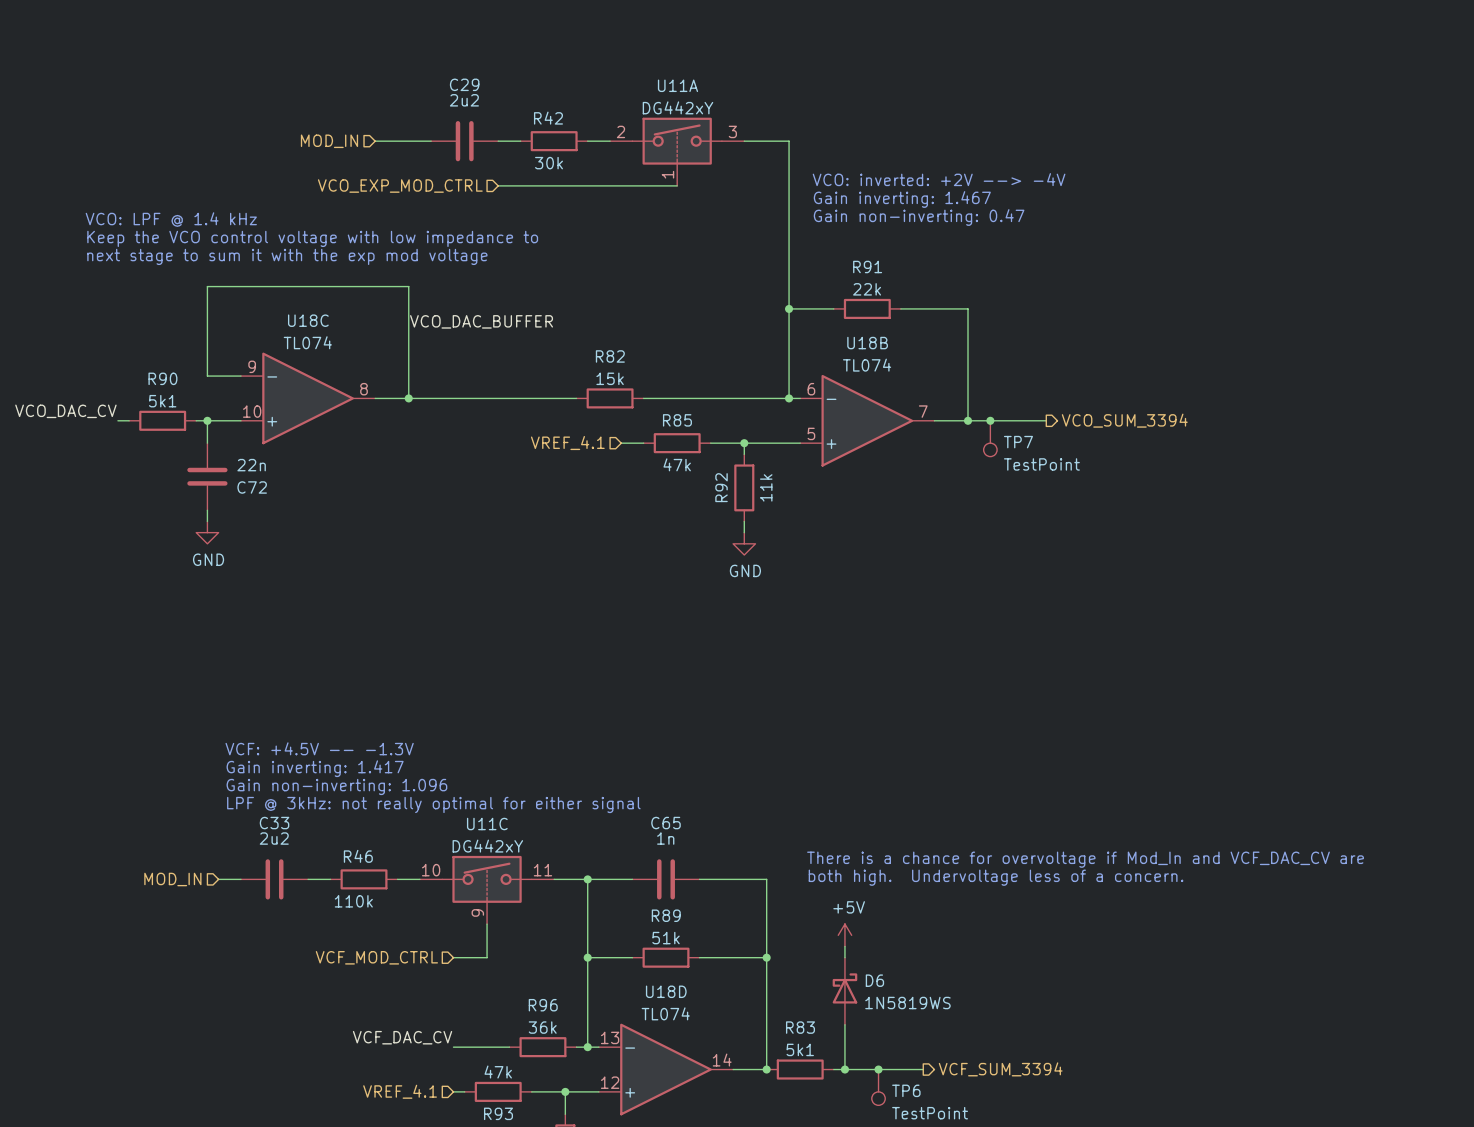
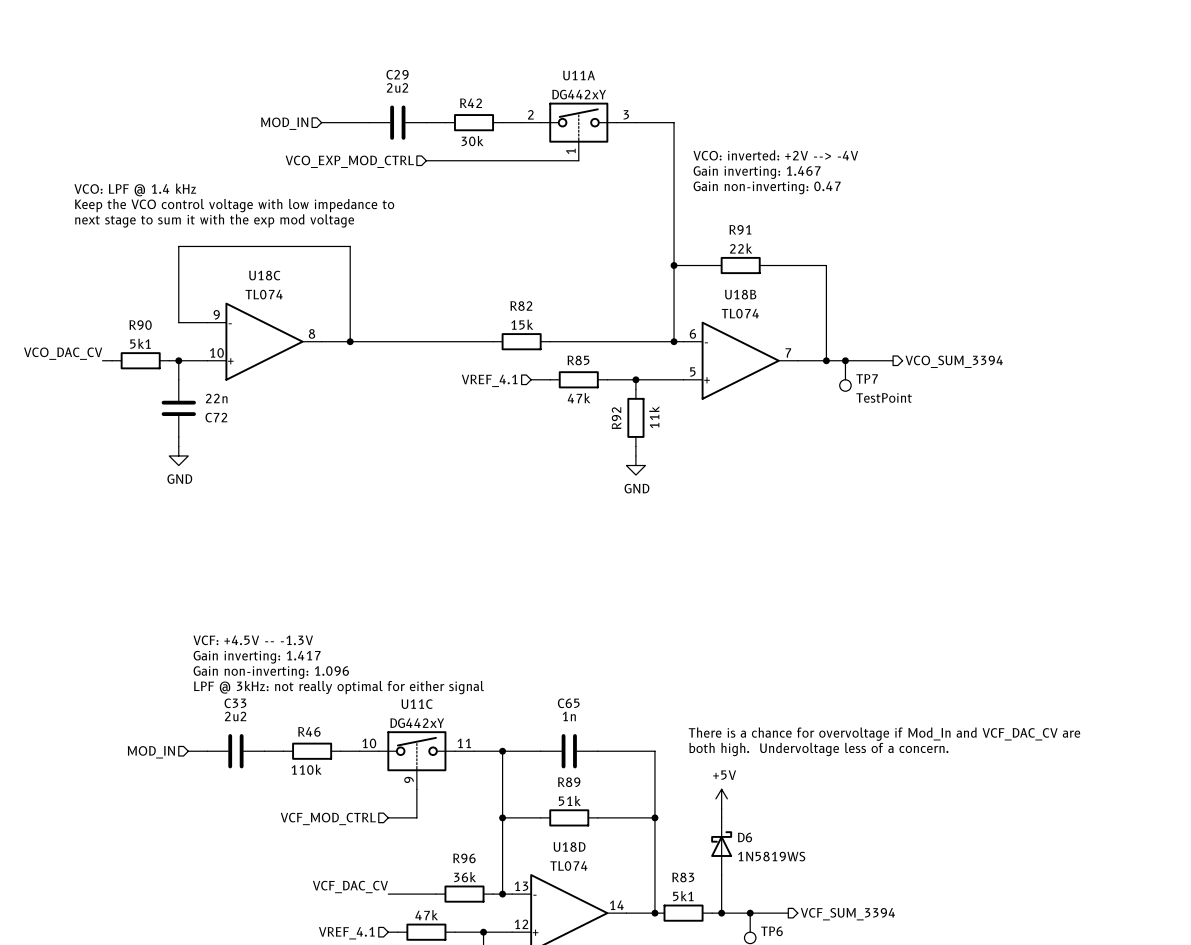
label: VCO_DAC_BUFFER (481, 321) -> none

